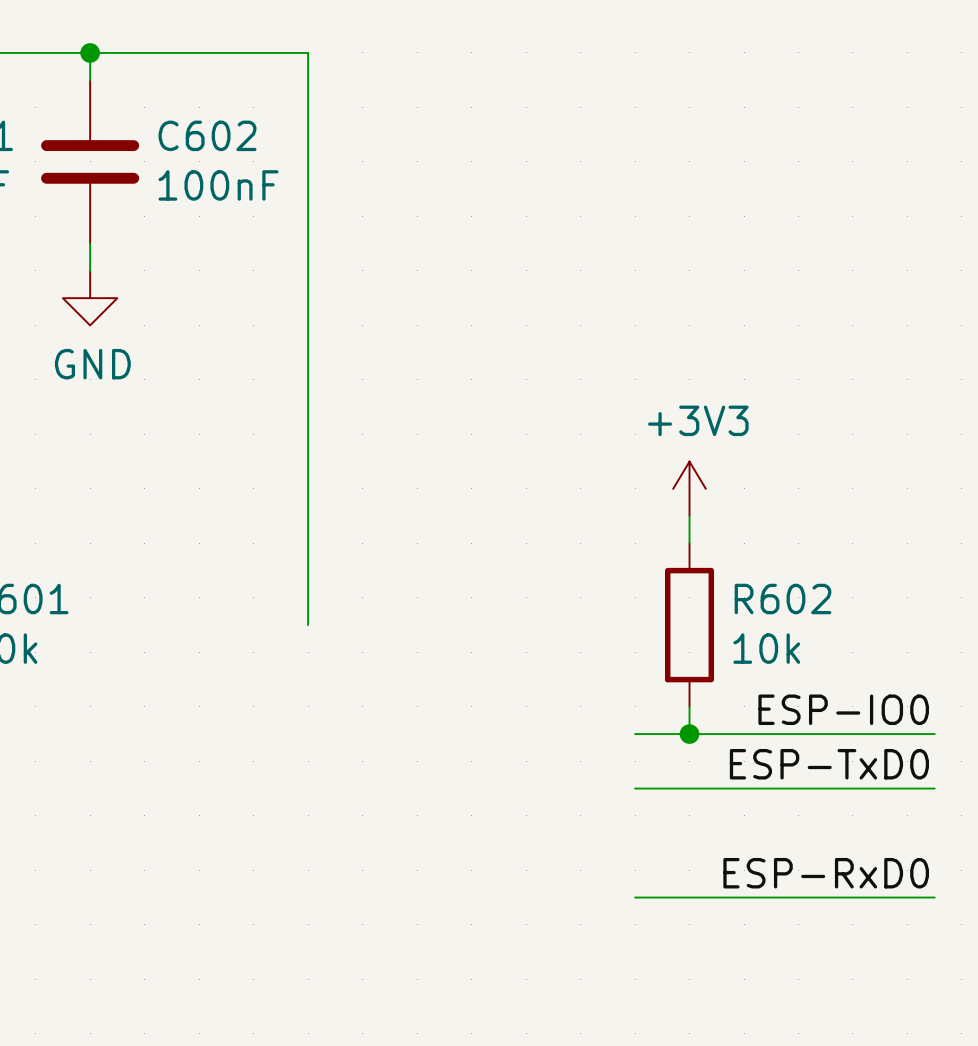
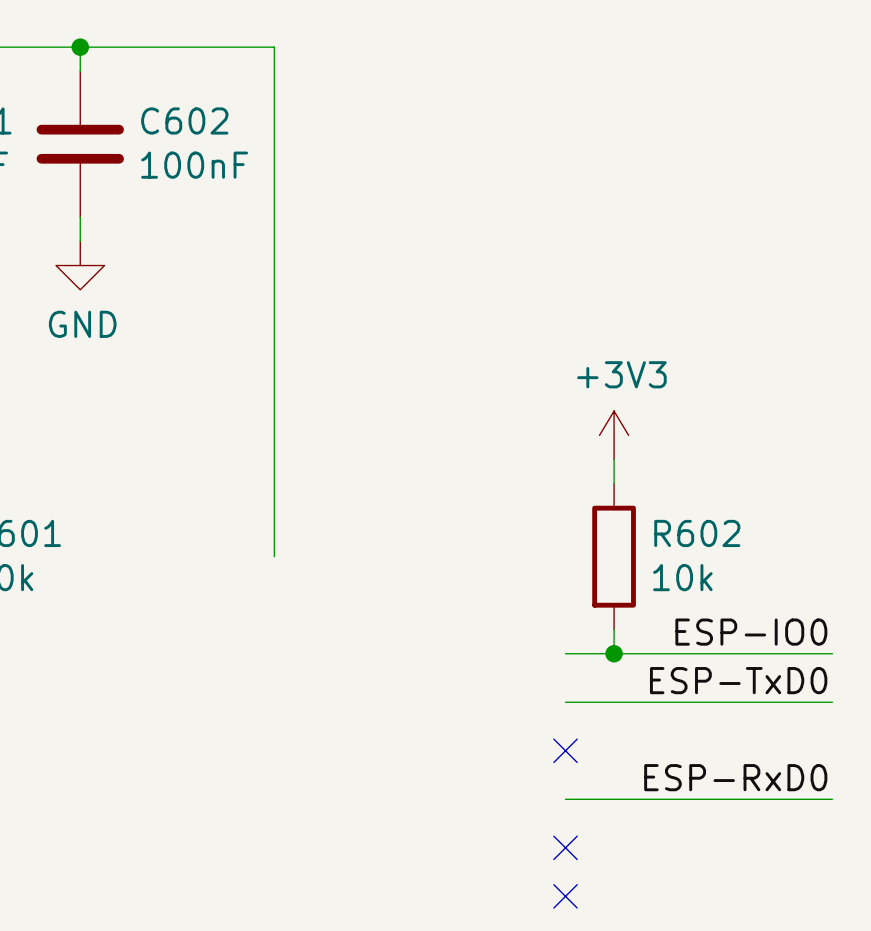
no-connect mark: none -> (565, 750)
no-connect mark: none -> (565, 847)
no-connect mark: none -> (565, 896)

